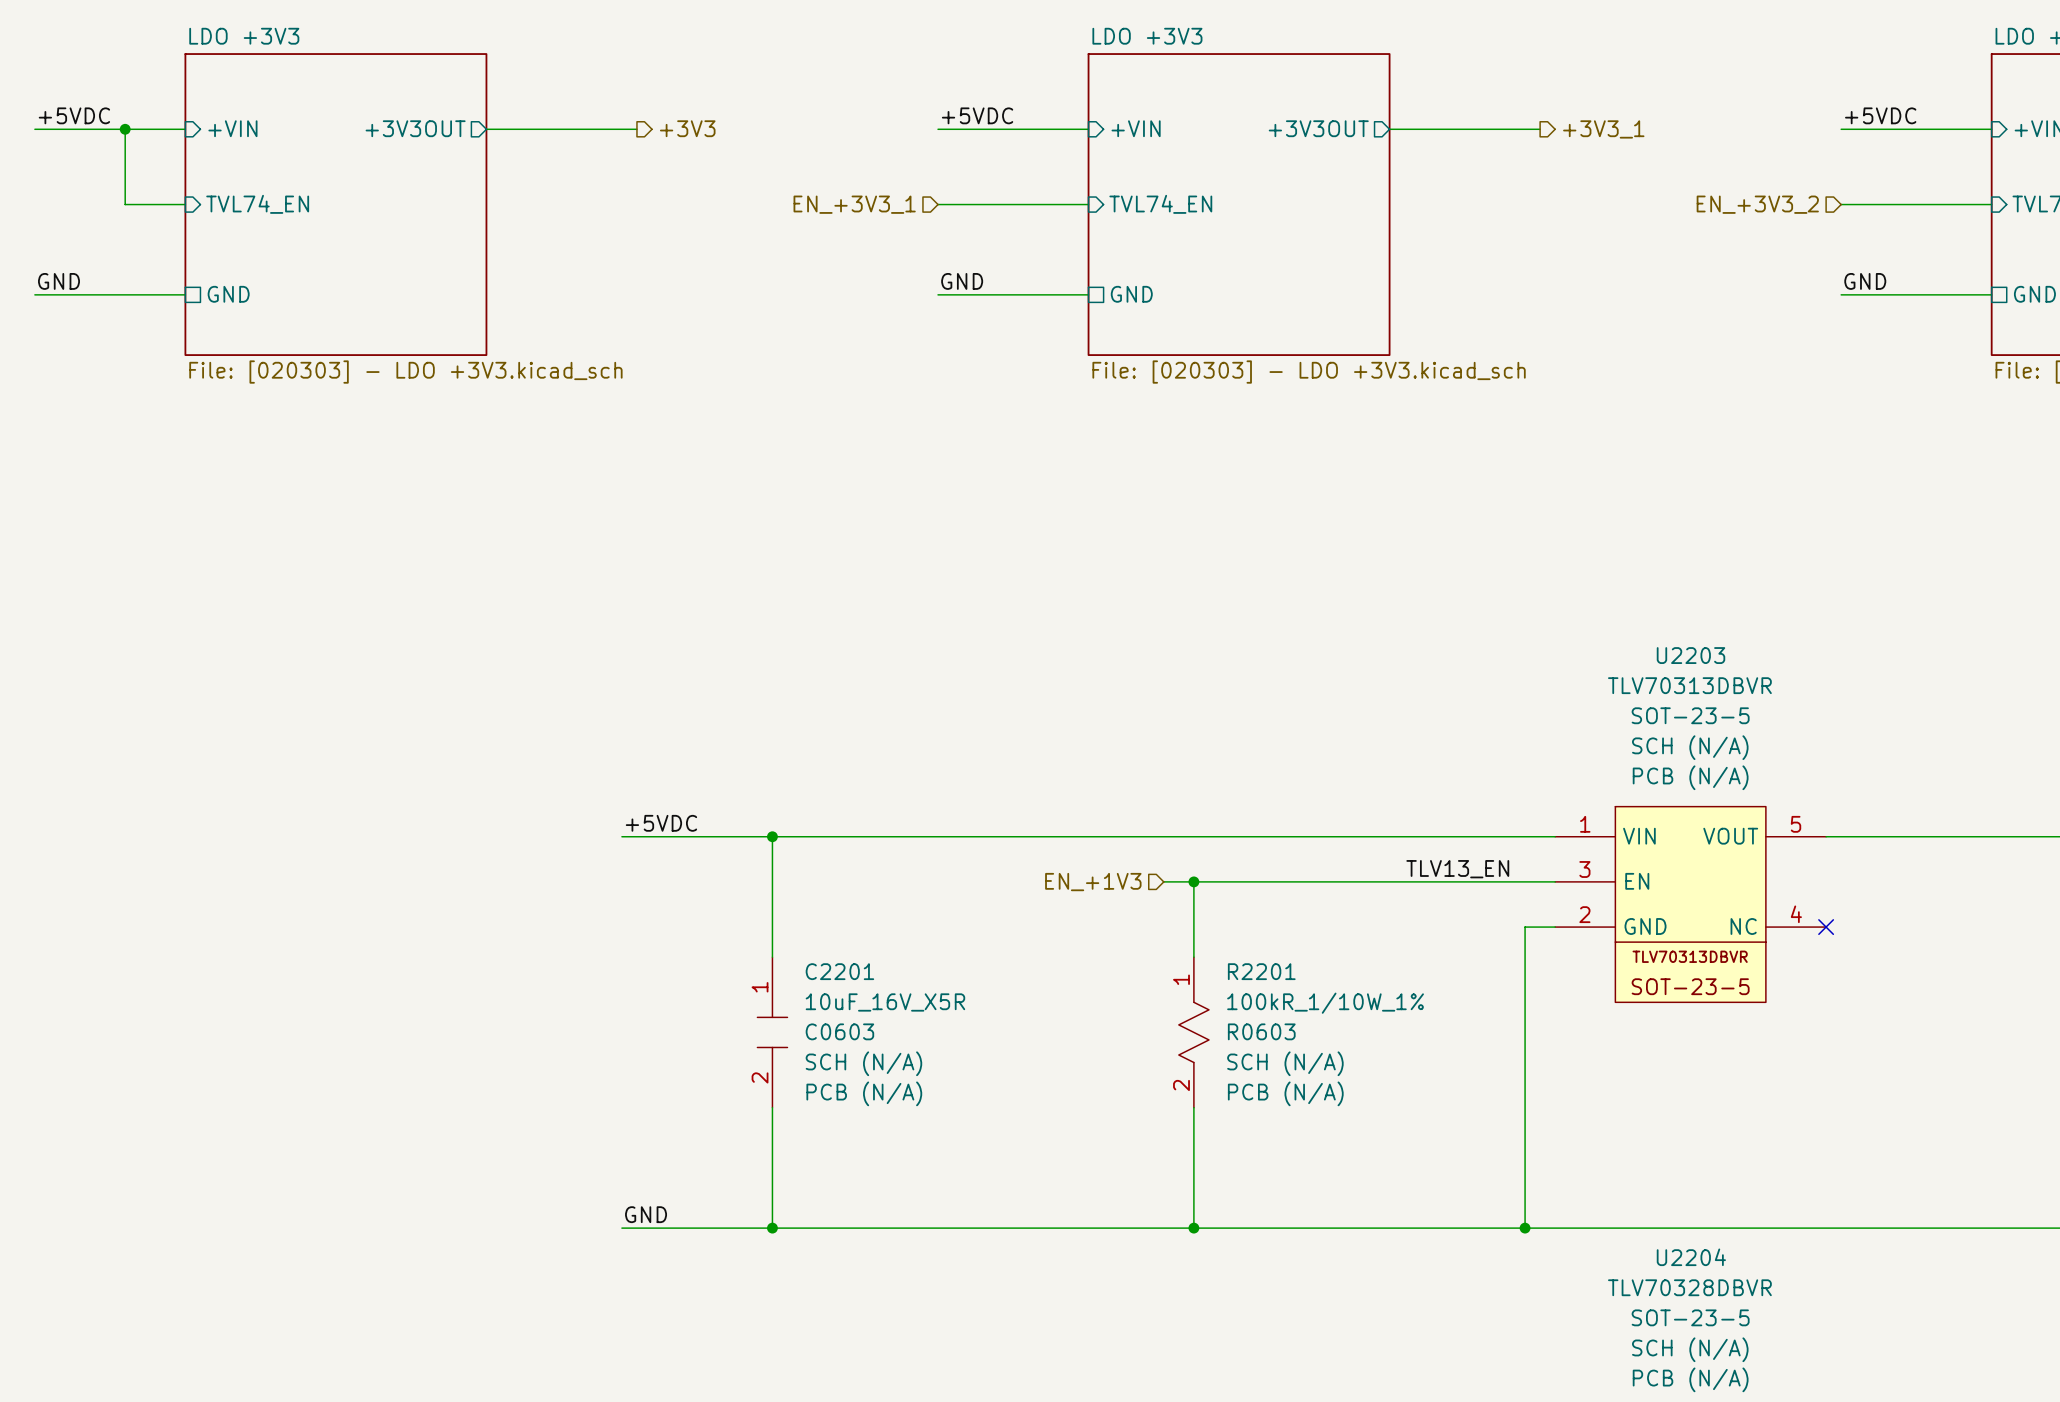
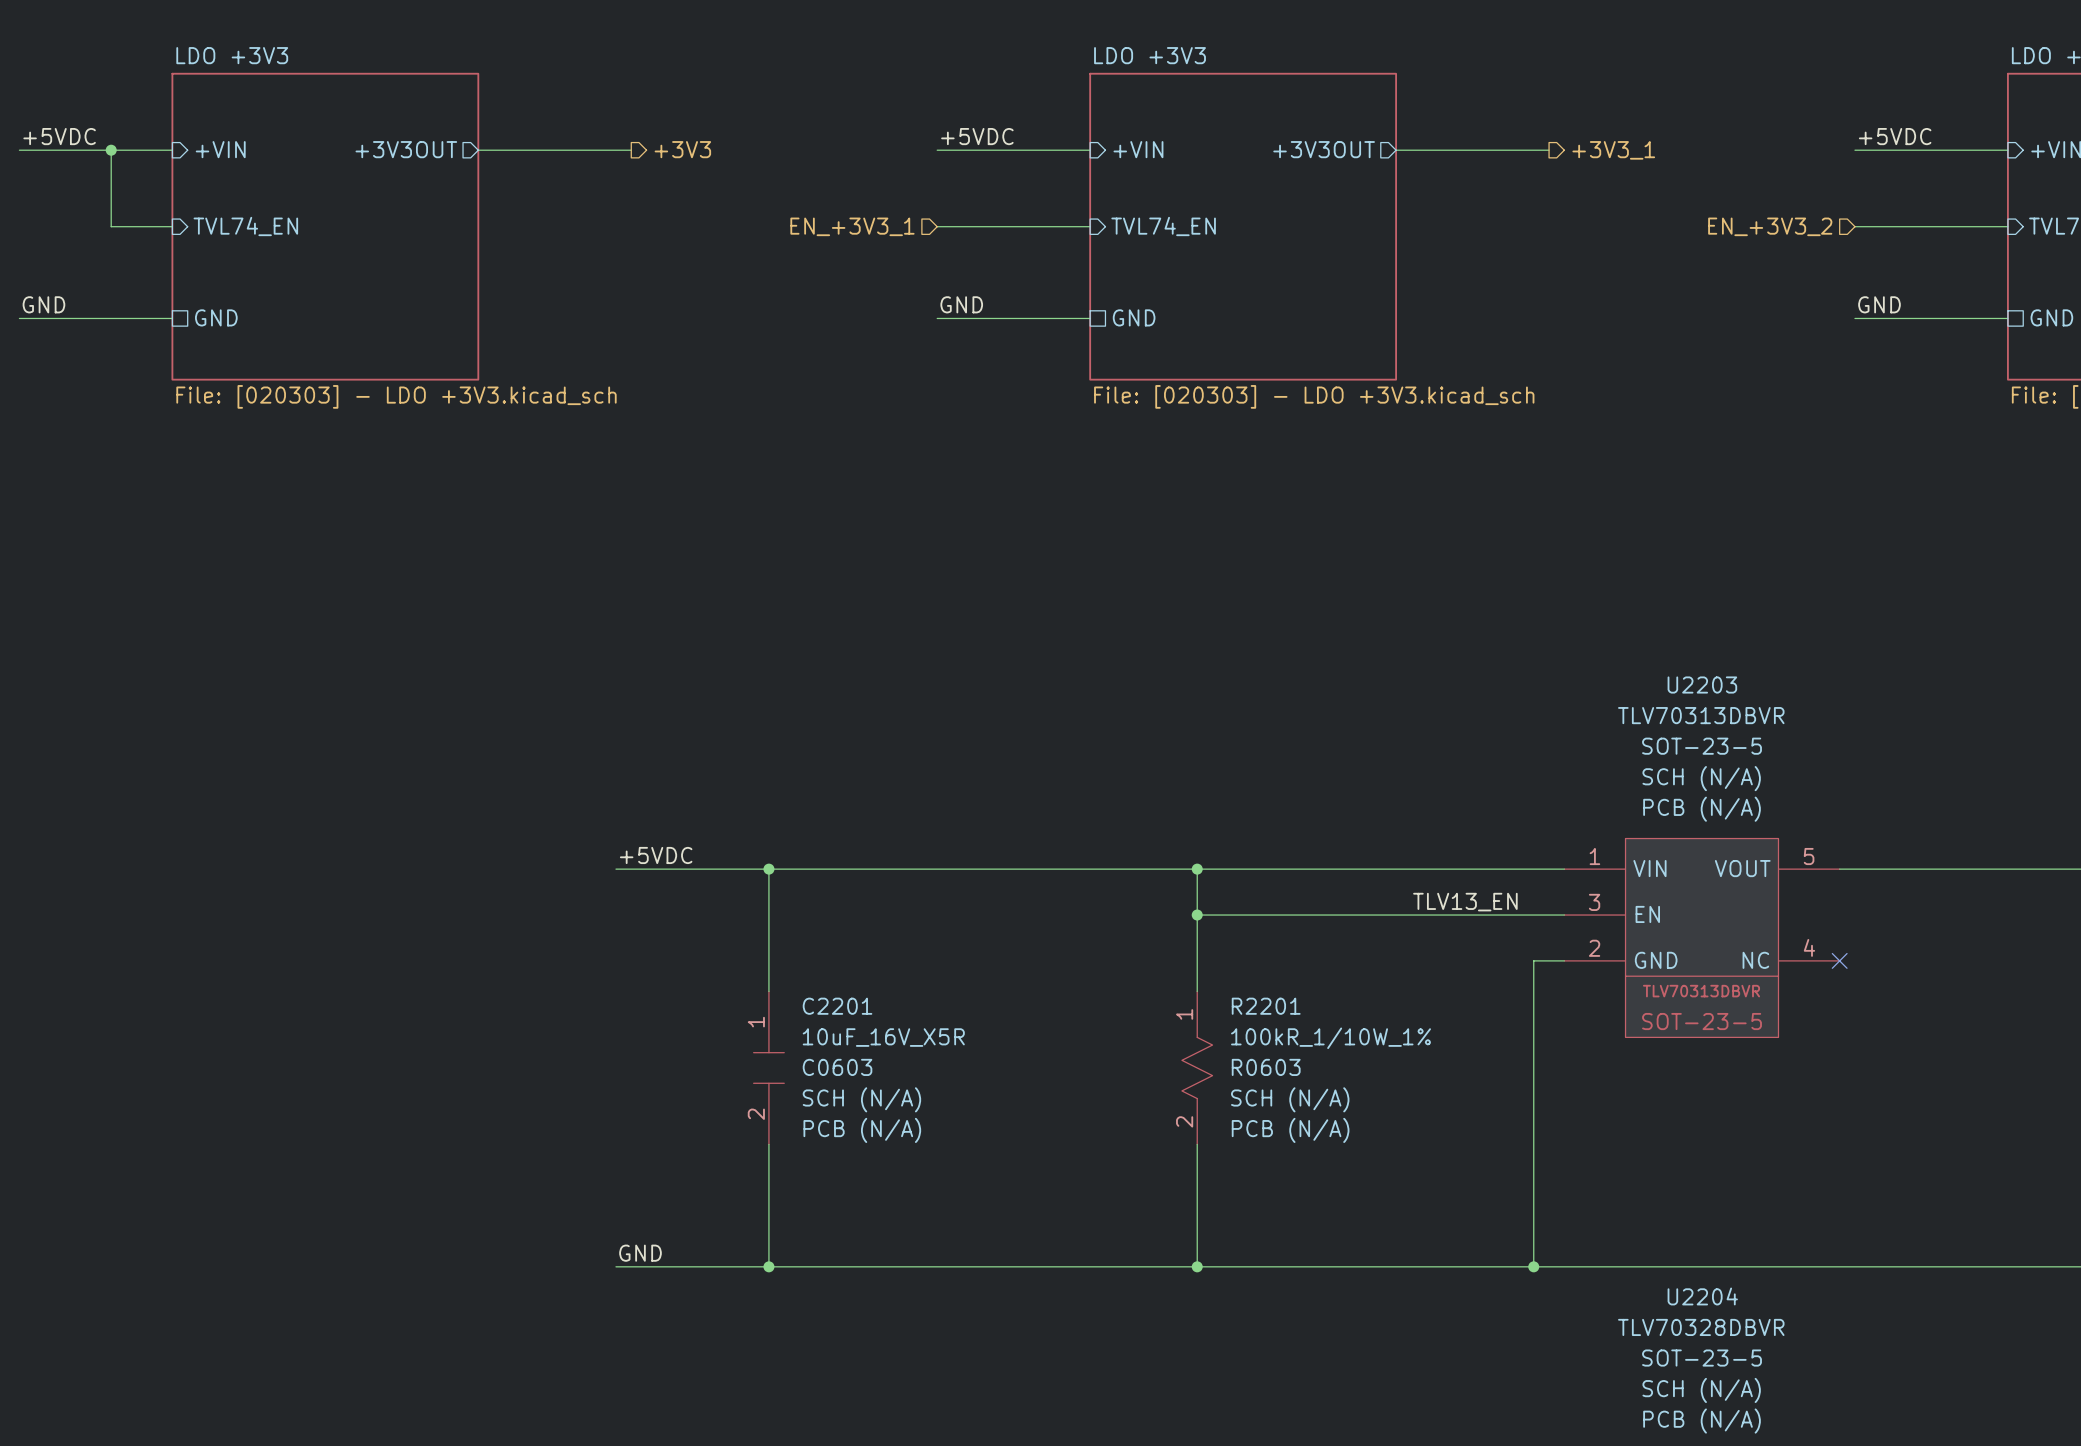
junction: none -> (1197, 869)
wire: (1163, 881) (1193, 881) -> (1197, 869) (1197, 915)
hierarchical label: EN_+1V3 (1093, 882) -> none

